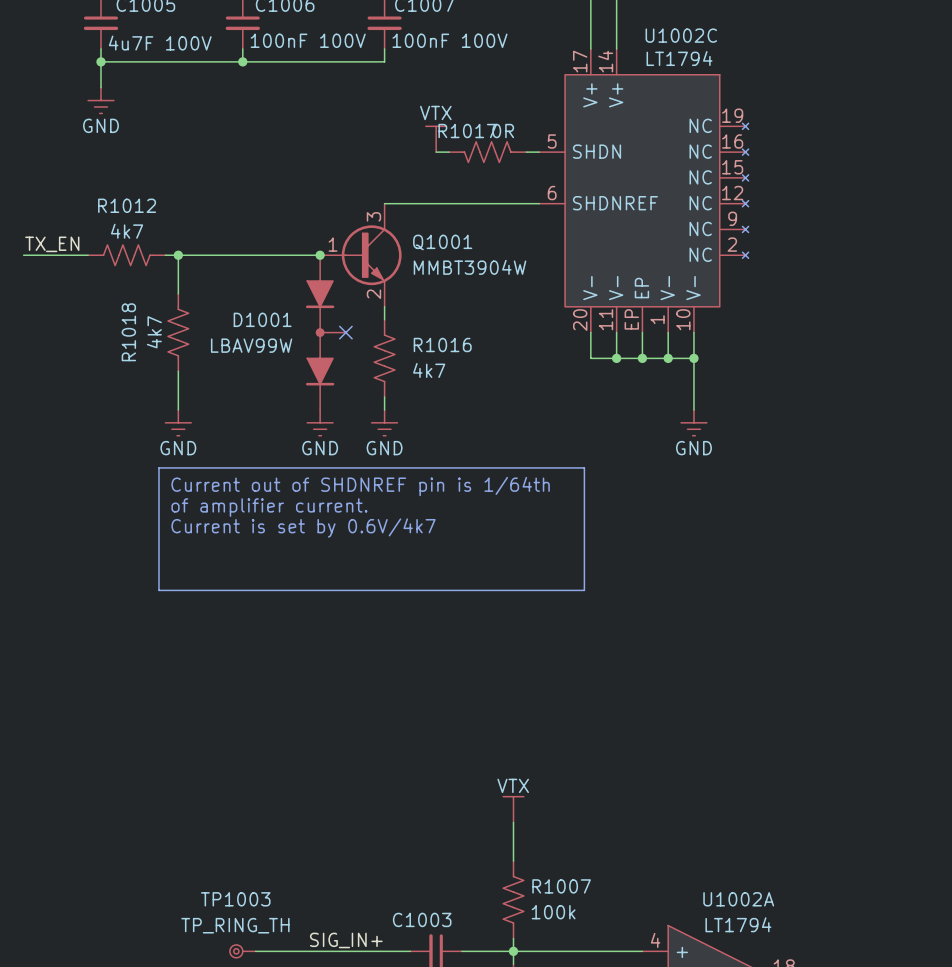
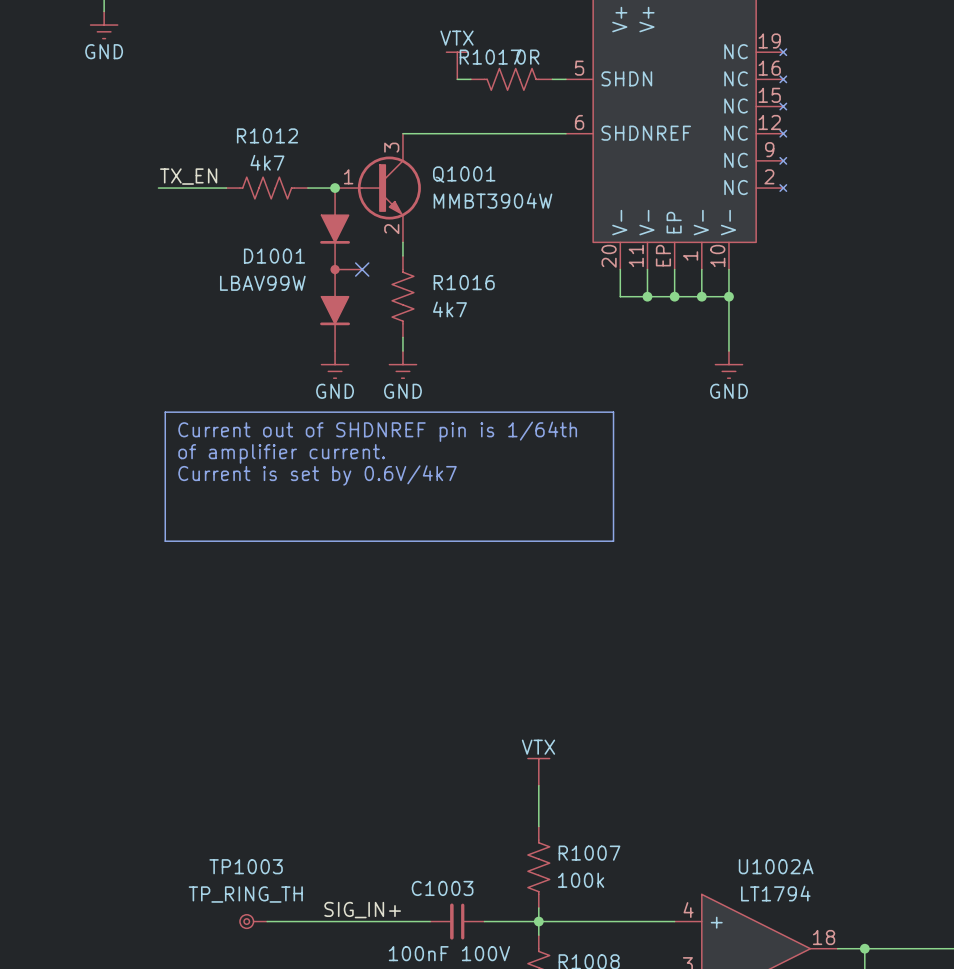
label position: TX_EN (52, 244) -> TX_EN (188, 176)
wire: (23, 255) (88, 255) -> none
R1012 position: (126, 255) -> (267, 188)
wire: (178, 255) (178, 293) -> none
junction: (178, 255) -> none
R1018: 4k7 (178, 332) -> none
wire: (178, 371) (178, 409) -> none
power symbol: GND (178, 422) -> none

